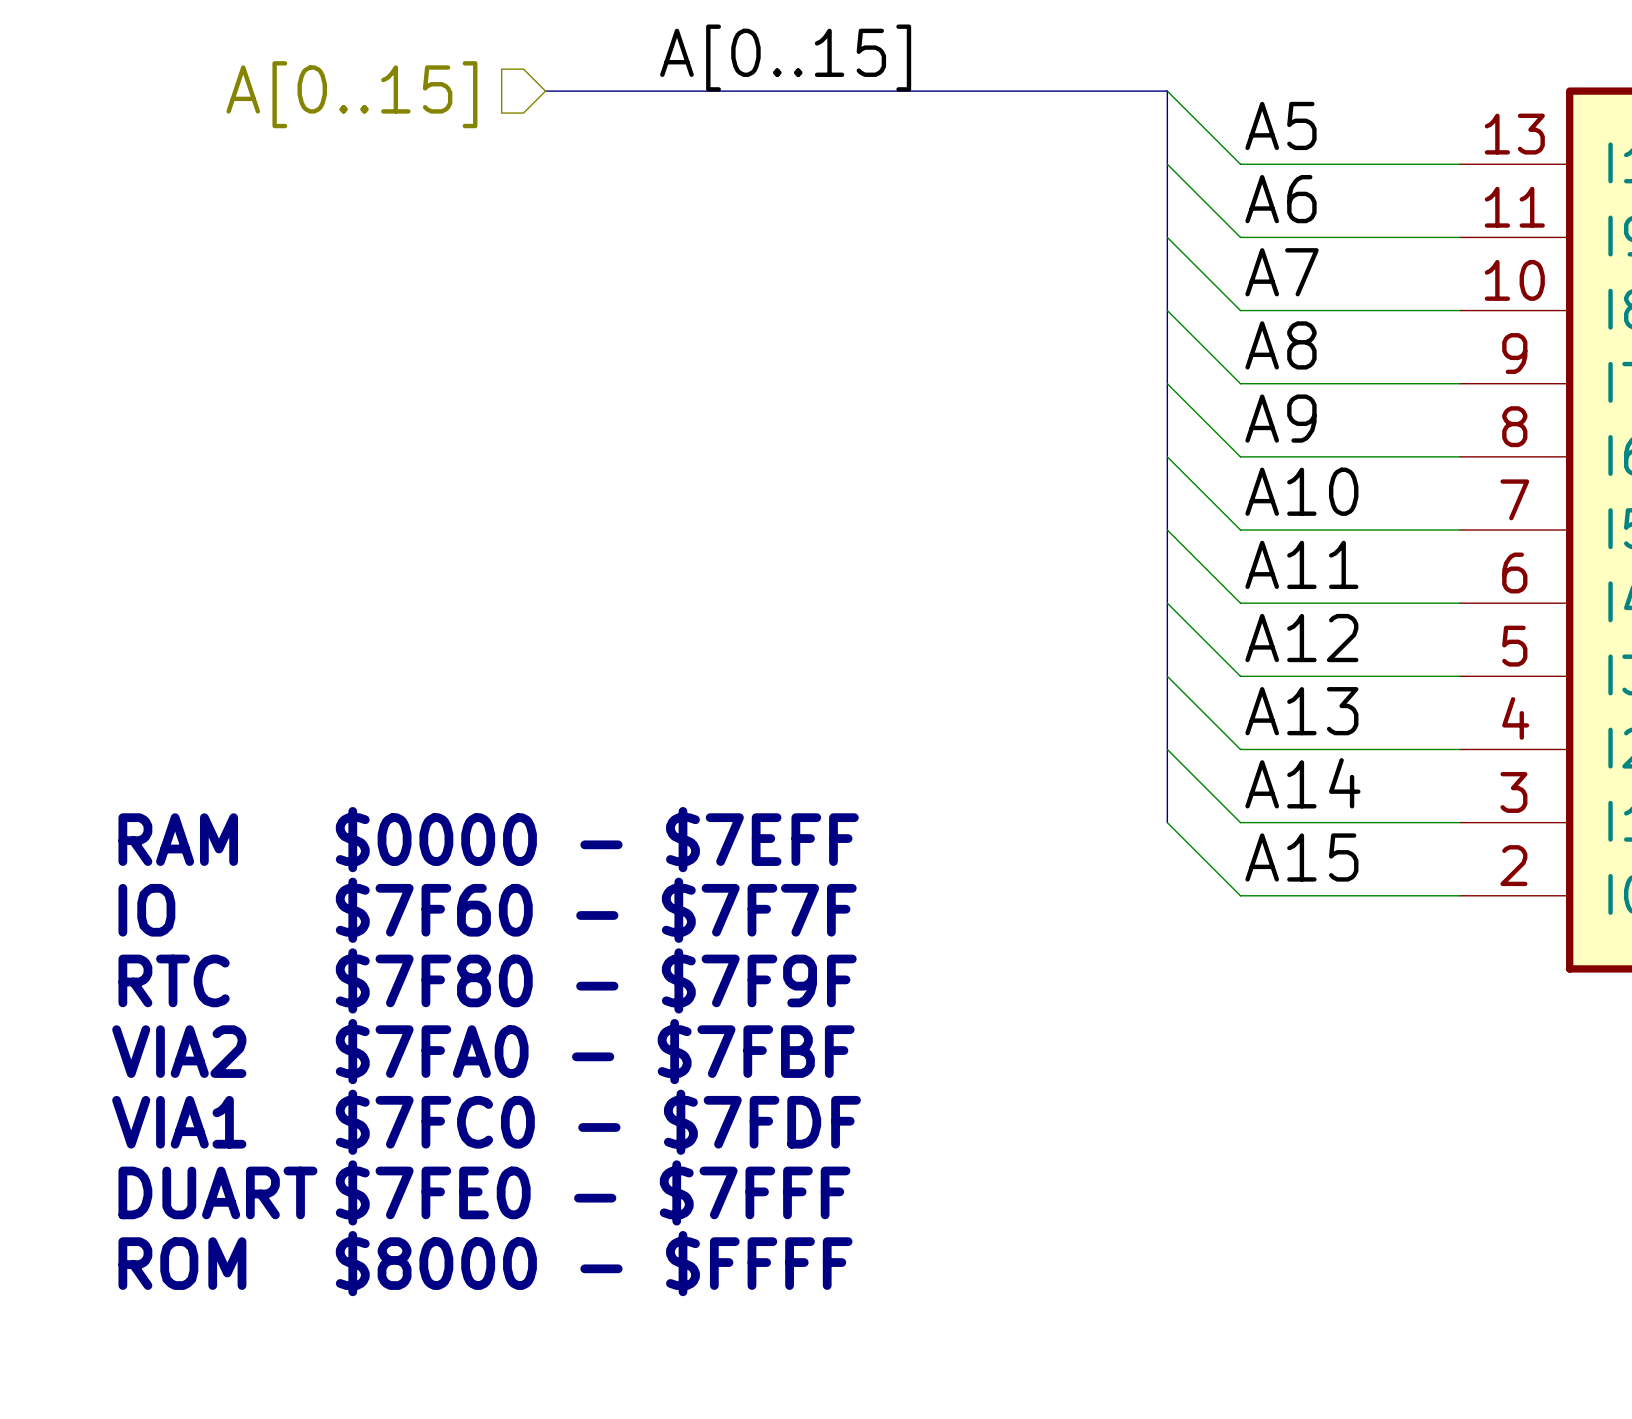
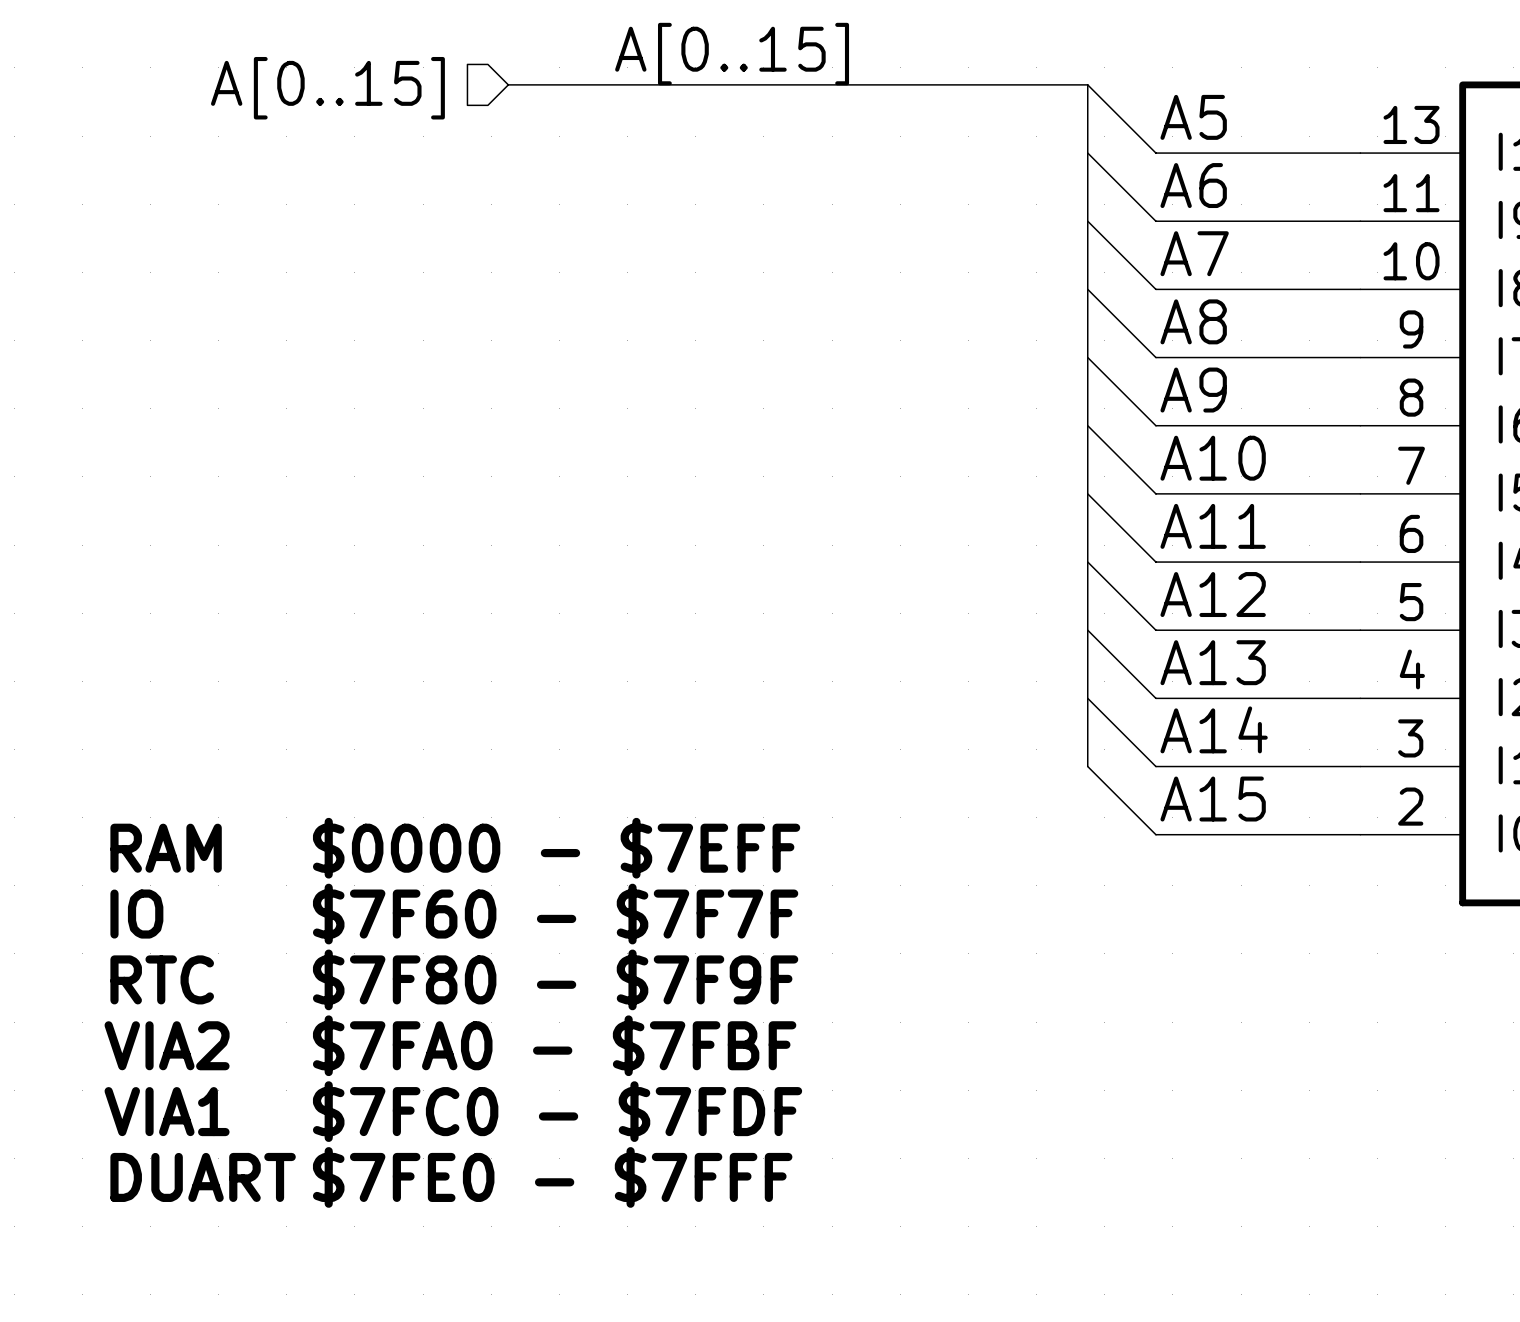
text: RAM (178, 839) -> none
text: $0000 - $7EFF (597, 839) -> none
text: IO (146, 910) -> RAM (166, 848)
text: $7F60 - $7F7F (596, 910) -> $0000 - $7EFF (556, 848)
text: RTC (174, 980) -> IO (136, 914)
text: $7F80 - $7F9F (596, 980) -> $7F60 - $7F7F (555, 914)
text: VIA2 (179, 1051) -> RTC (162, 979)
text: $7FA0 - $7FBF (595, 1051) -> $7F80 - $7F9F (555, 979)
text: VIA1 (179, 1122) -> VIA2 (167, 1045)
text: $7FC0 - $7FDF (598, 1122) -> $7FA0 - $7FBF (554, 1045)
text: DUART (217, 1192) -> VIA1 (167, 1111)
text: $7FE0 - $7FFF (593, 1192) -> $7FC0 - $7FDF (557, 1111)
text: ROM (182, 1263) -> DUART (203, 1177)
text: $8000 - $FFFF (594, 1263) -> $7FE0 - $7FFF (552, 1177)

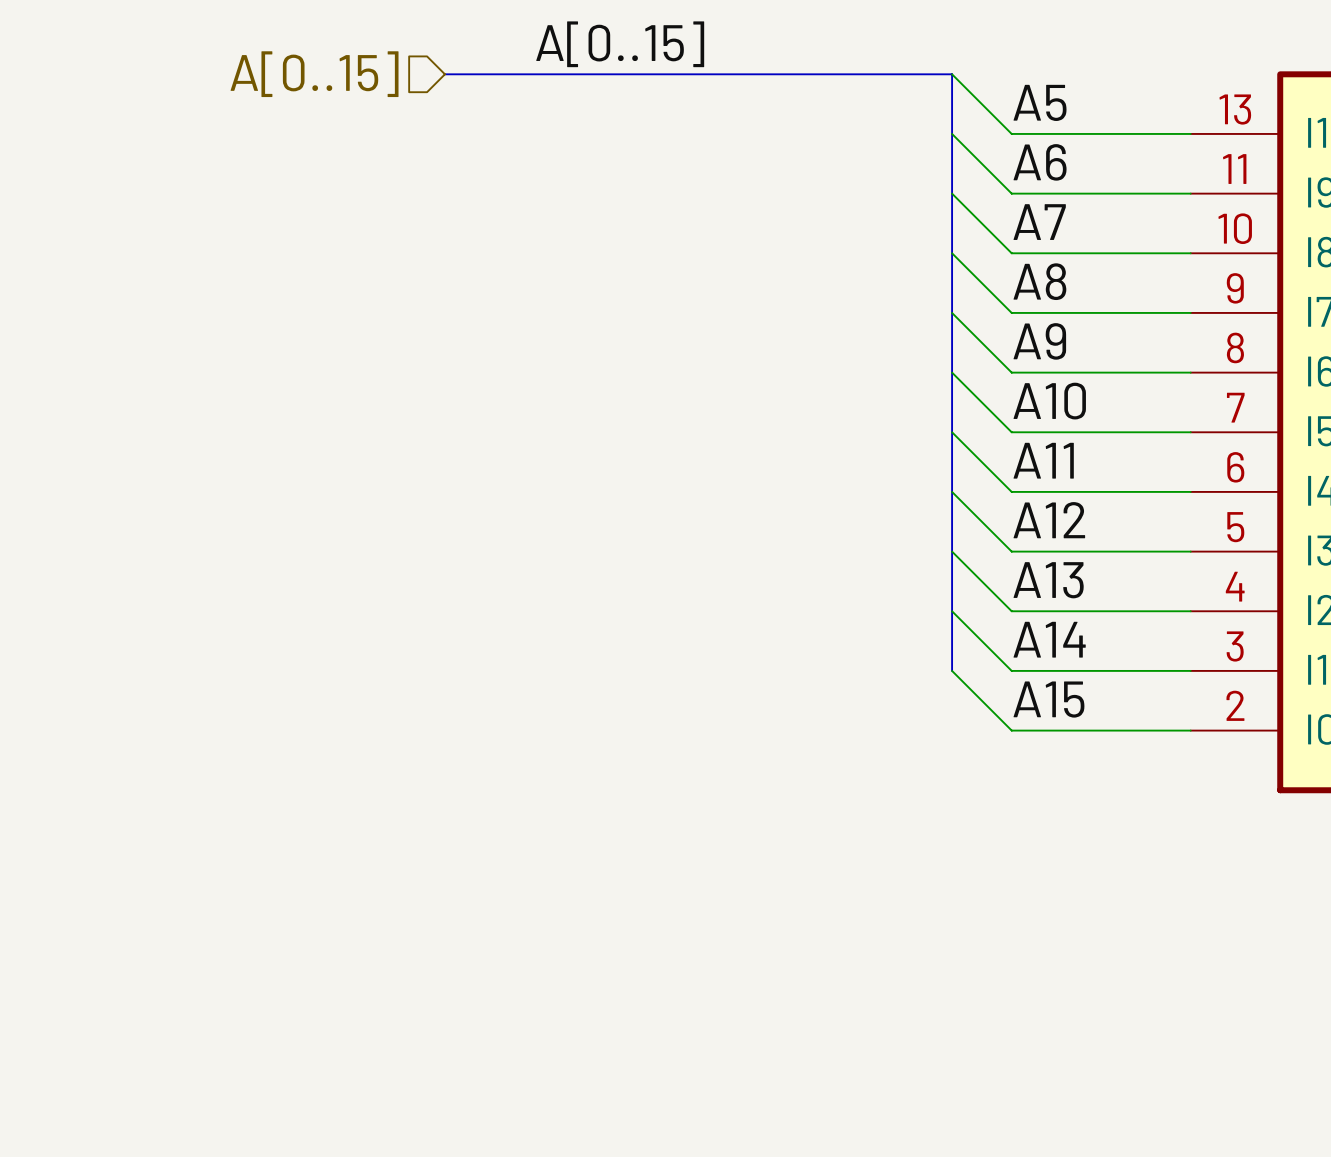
text: RAM (166, 848) -> none
text: $0000 - $7EFF (556, 848) -> none
text: IO (136, 914) -> none
text: $7F60 - $7F7F (555, 914) -> none
text: RTC (162, 979) -> none
text: $7F80 - $7F9F (555, 979) -> none
text: VIA2 (167, 1045) -> none
text: $7FA0 - $7FBF (554, 1045) -> none
text: VIA1 (167, 1111) -> none
text: $7FC0 - $7FDF (557, 1111) -> none
text: DUART (203, 1177) -> none
text: $7FE0 - $7FFF (552, 1177) -> none

